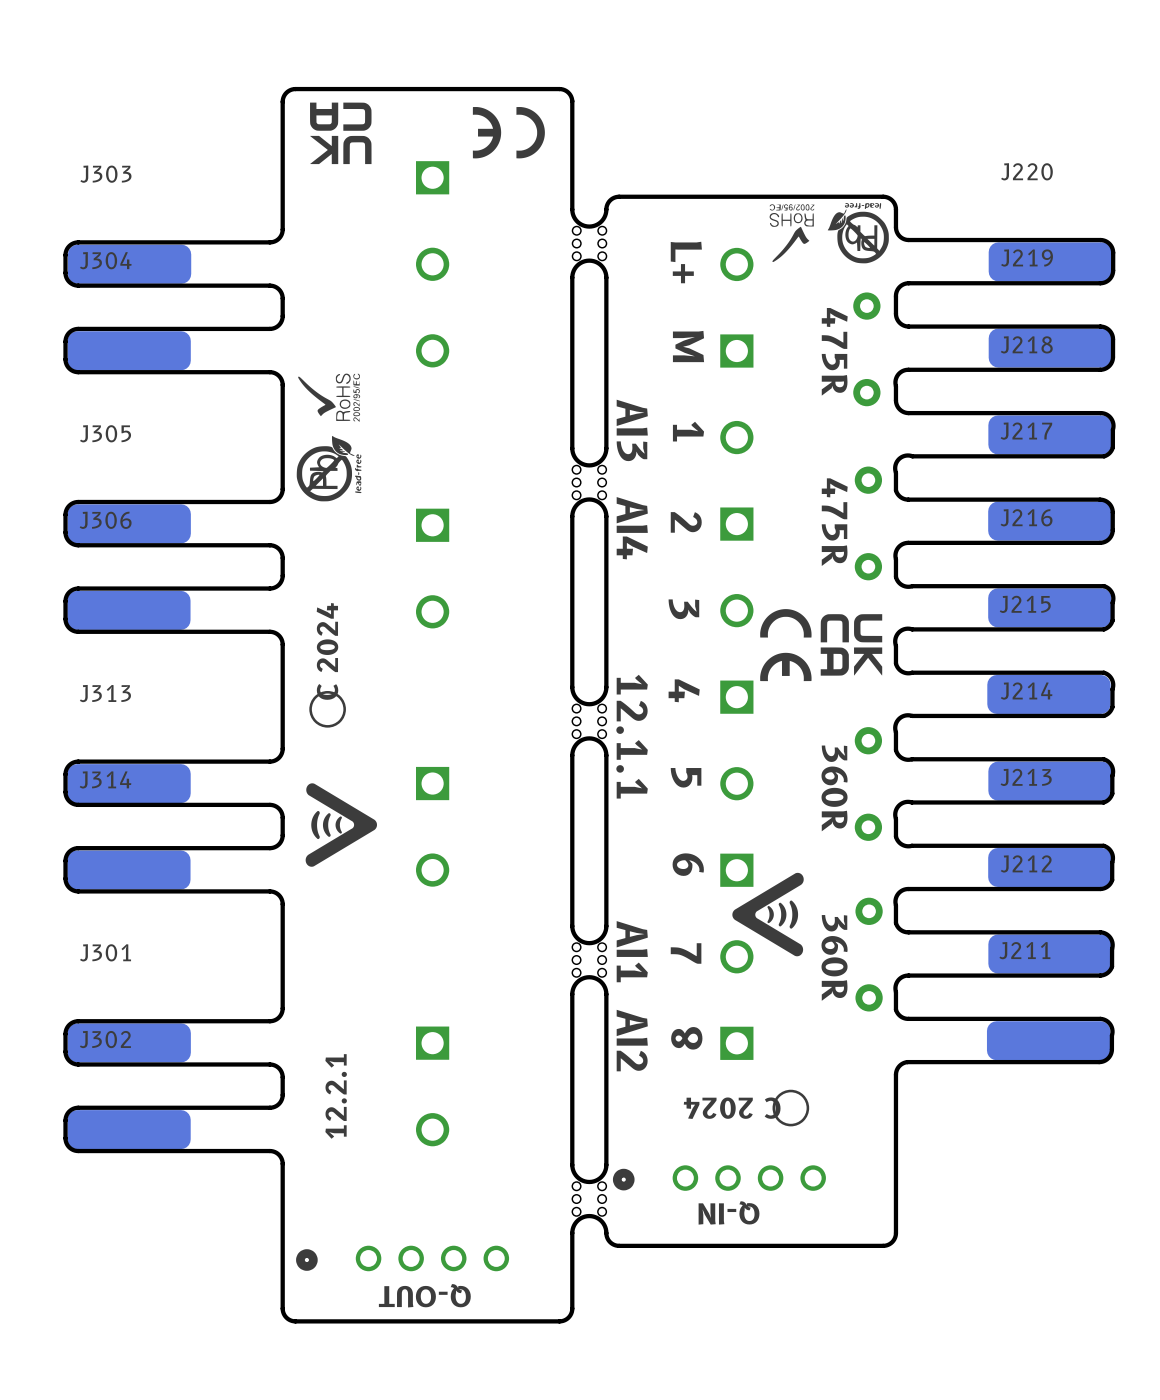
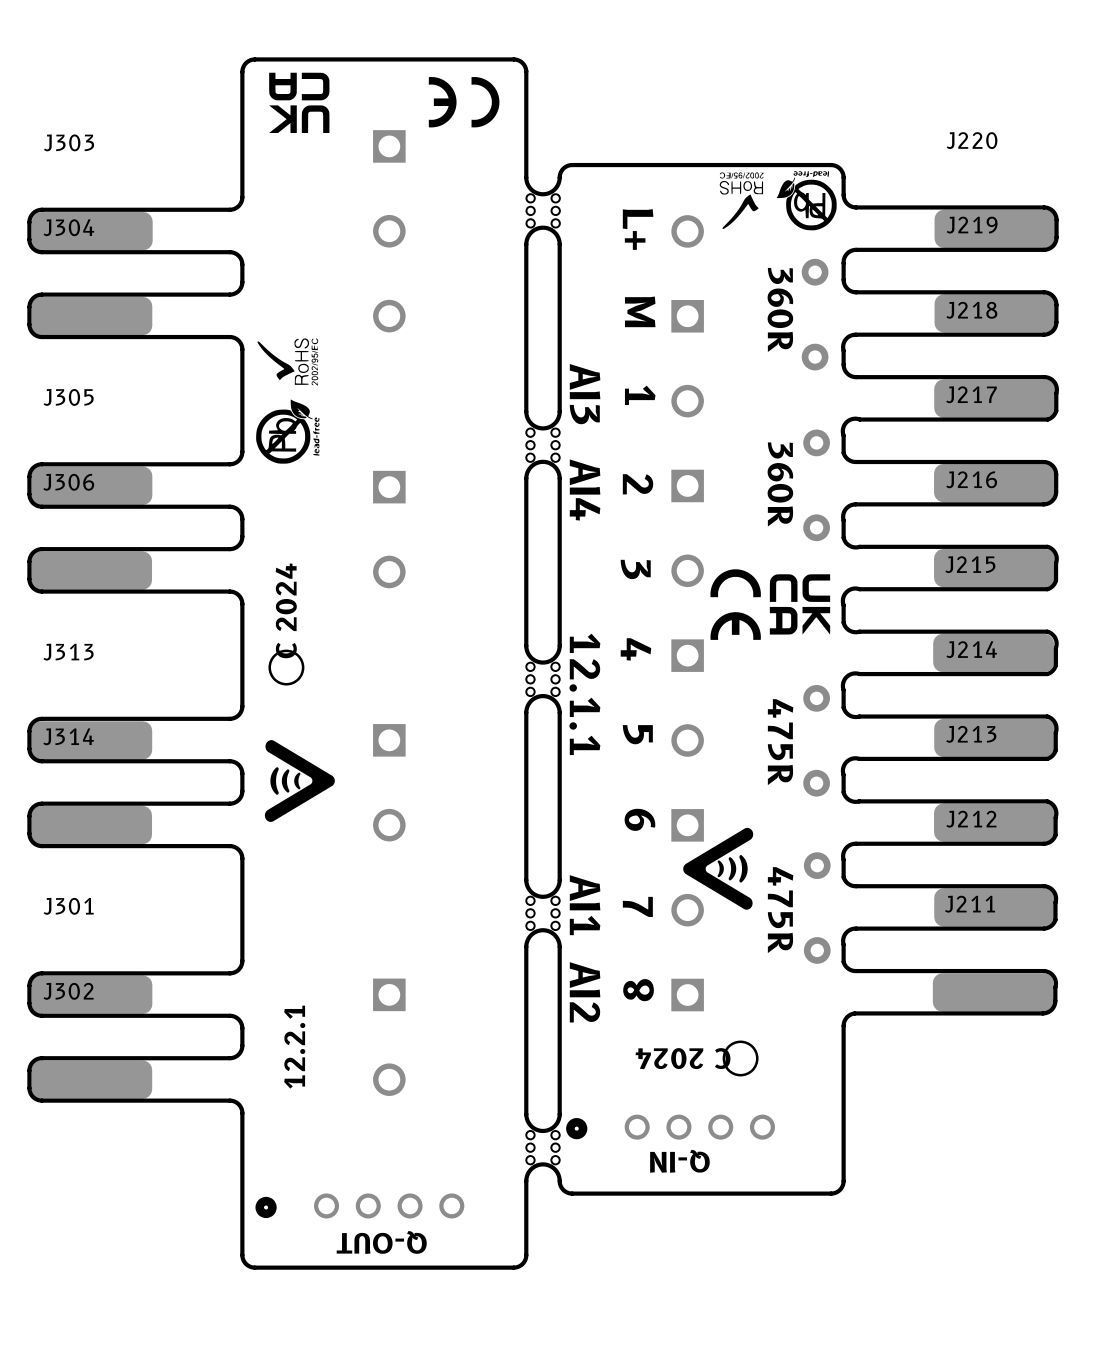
text: 475R (834, 351) -> 360R (780, 309)
text: 475R (834, 522) -> 360R (780, 484)
text: 360R (834, 788) -> 475R (780, 742)
text: 360R (834, 957) -> 475R (780, 910)

